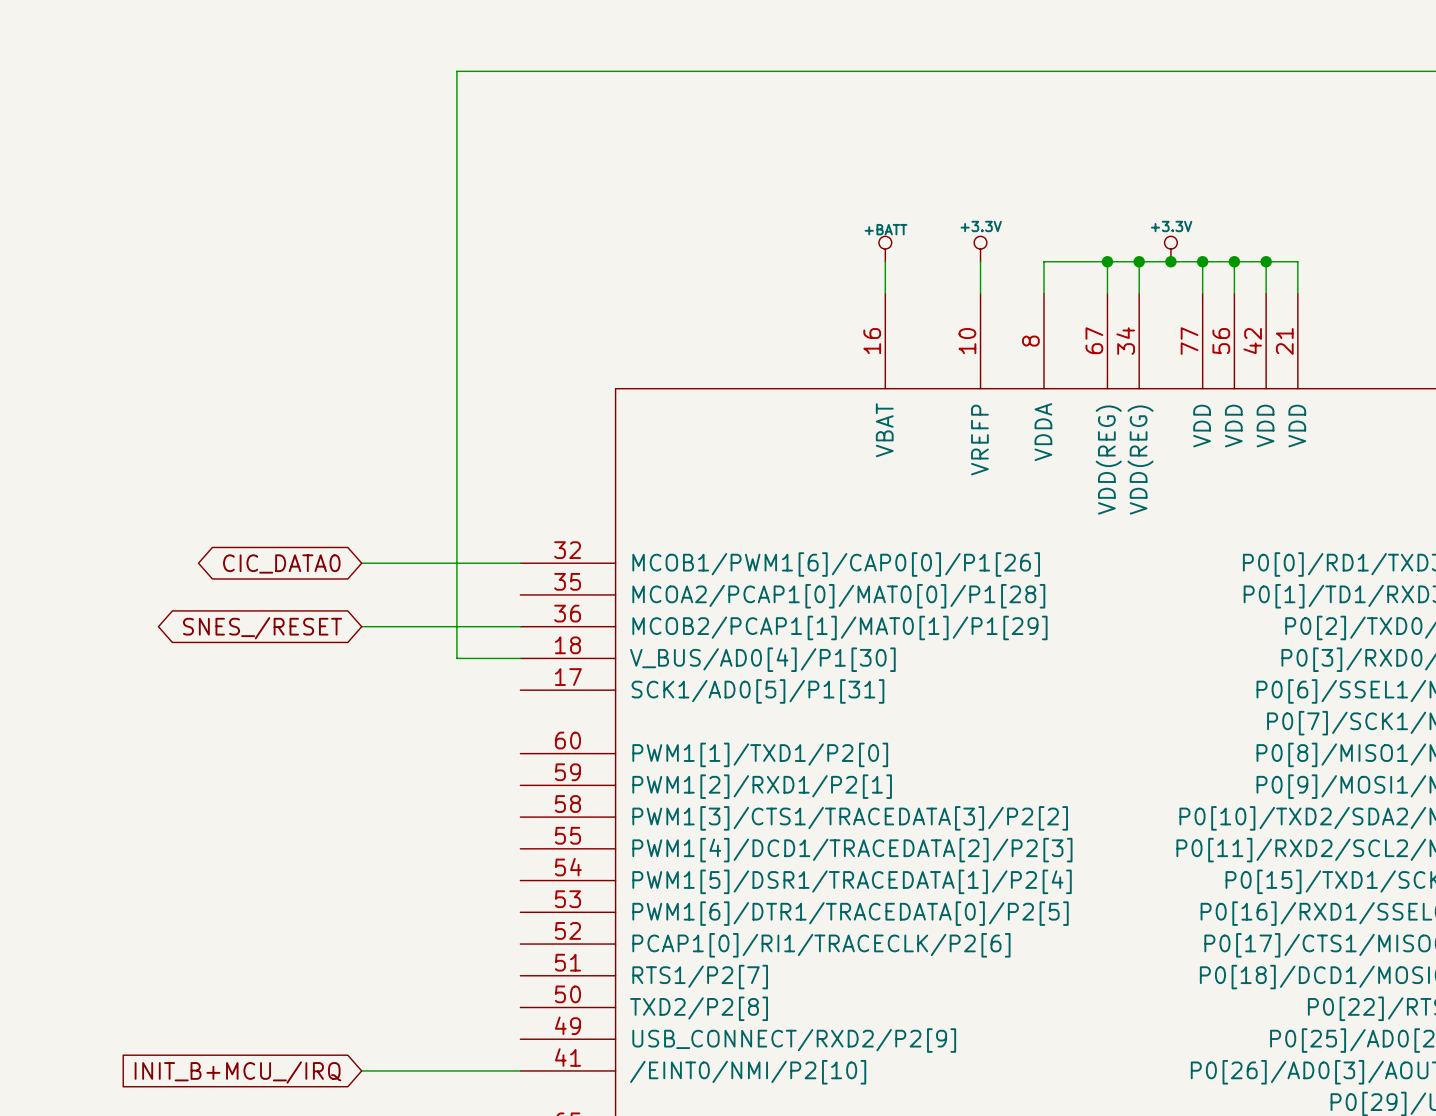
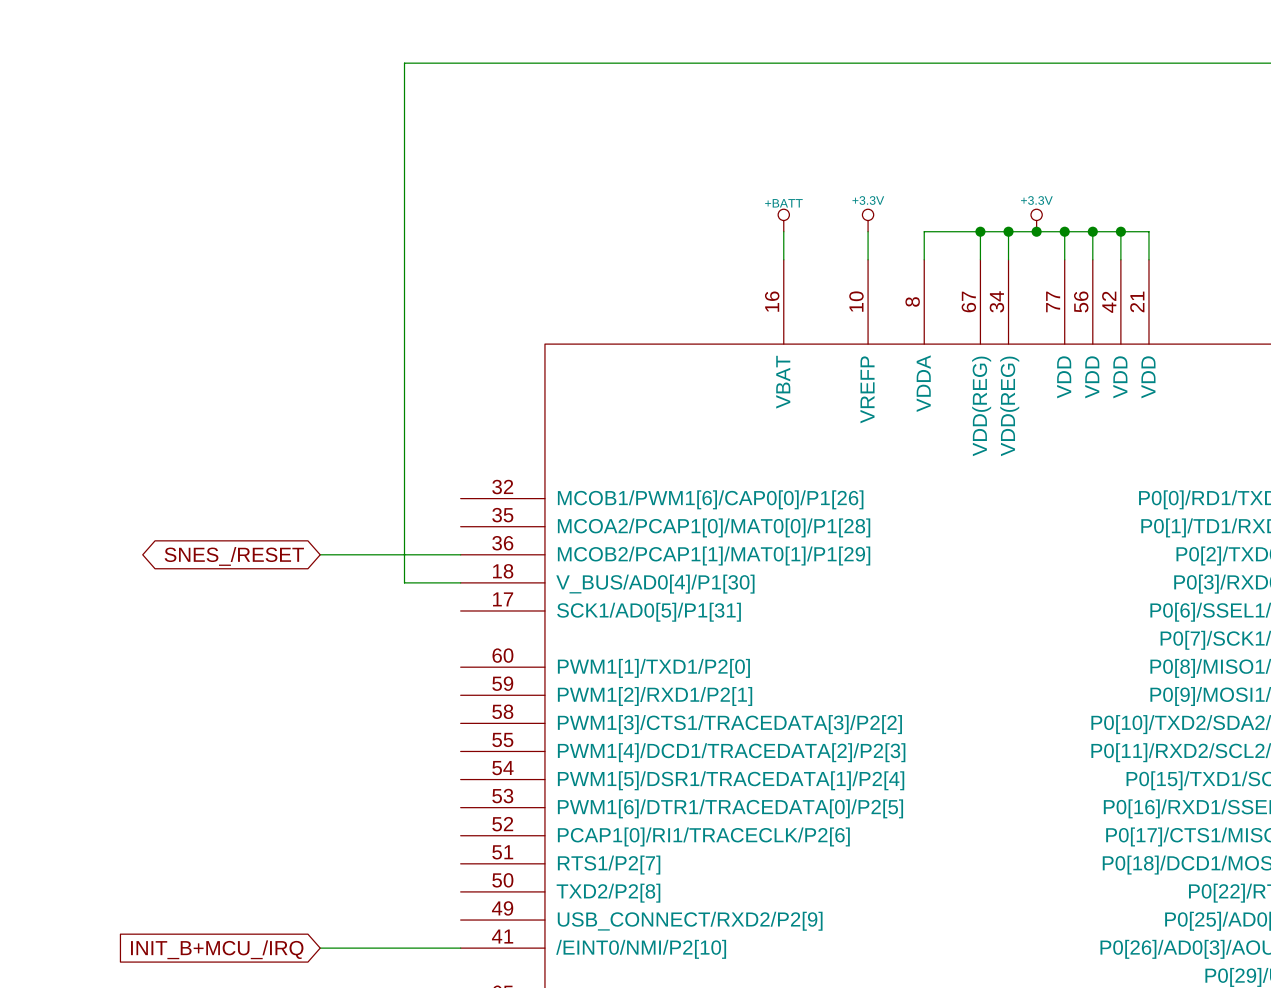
global label: CIC_DATA0 (281, 563) -> none
wire: (361, 563) (520, 563) -> none

